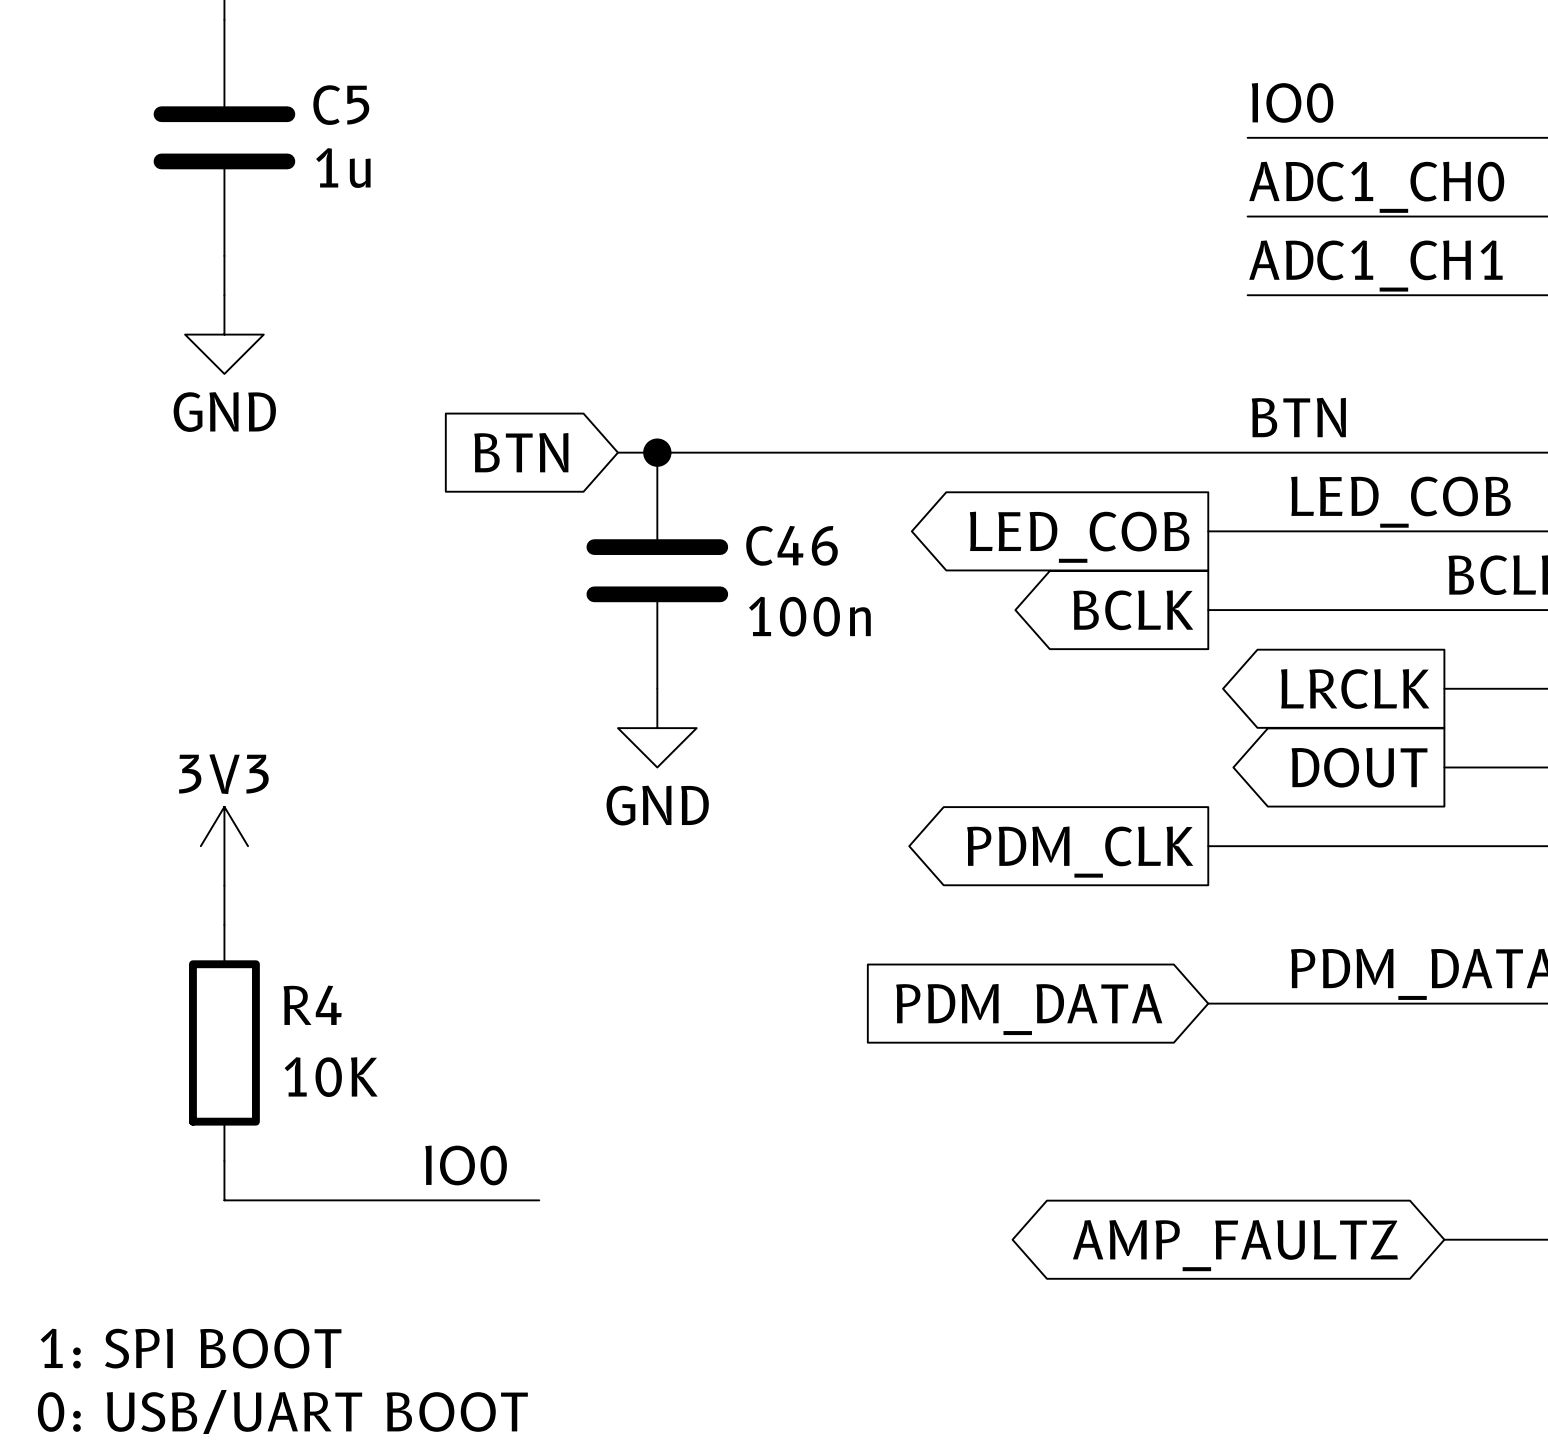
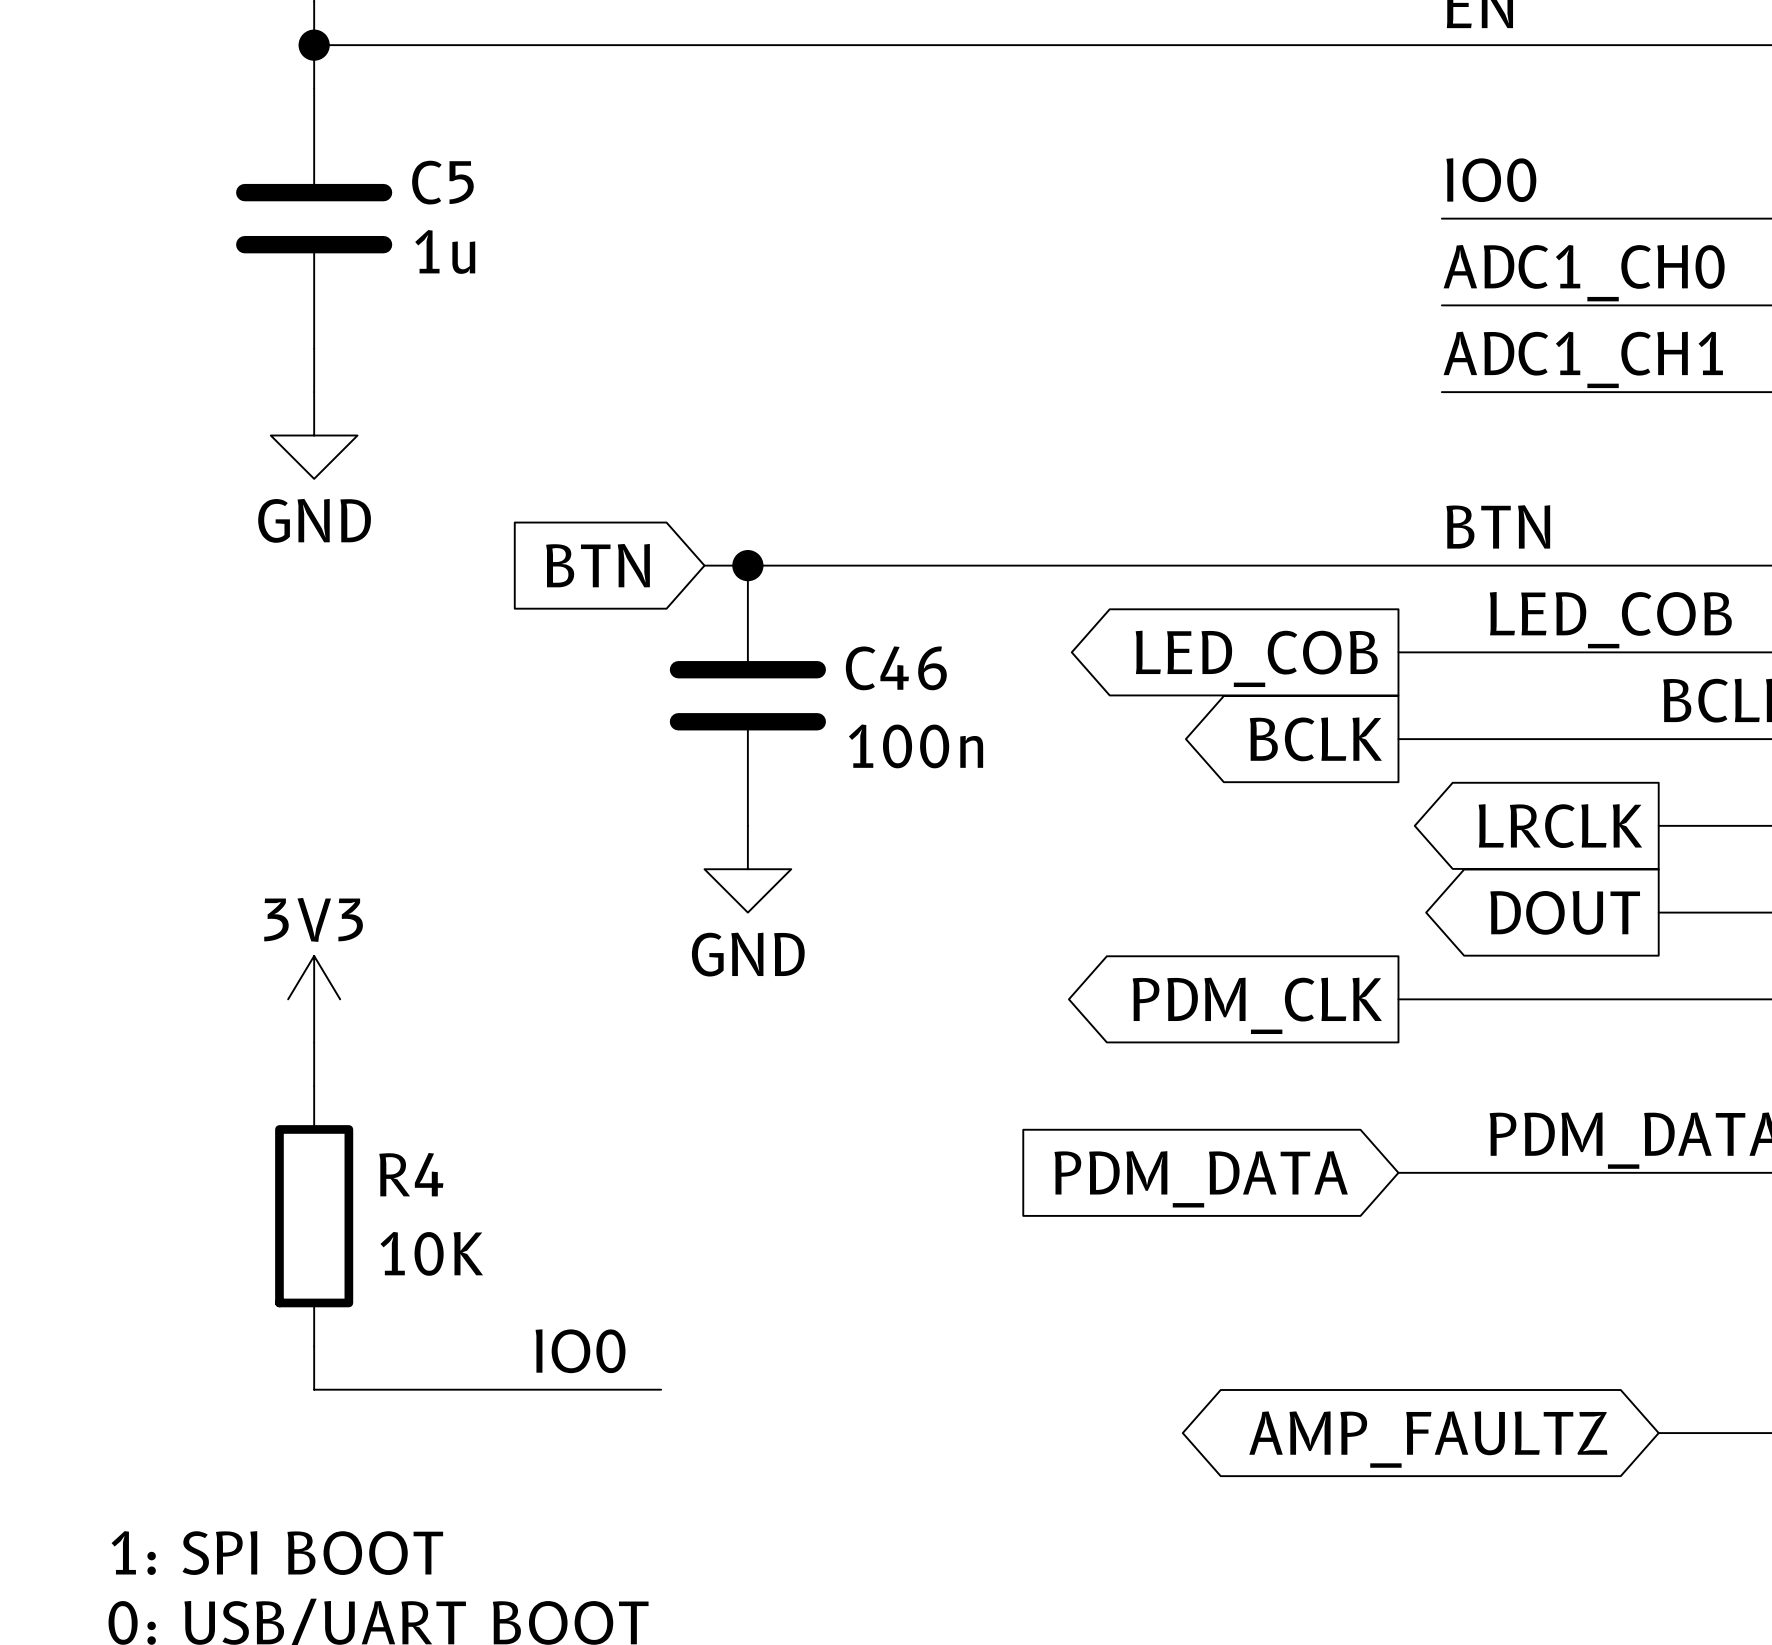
global label position: BTN (521, 452) -> BTN (598, 565)
wire: none -> (704, 565) (747, 565)
junction position: (657, 452) -> (747, 565)
C46 position: (657, 570) -> (747, 695)
power symbol position: GND (657, 728) -> GND (747, 869)

